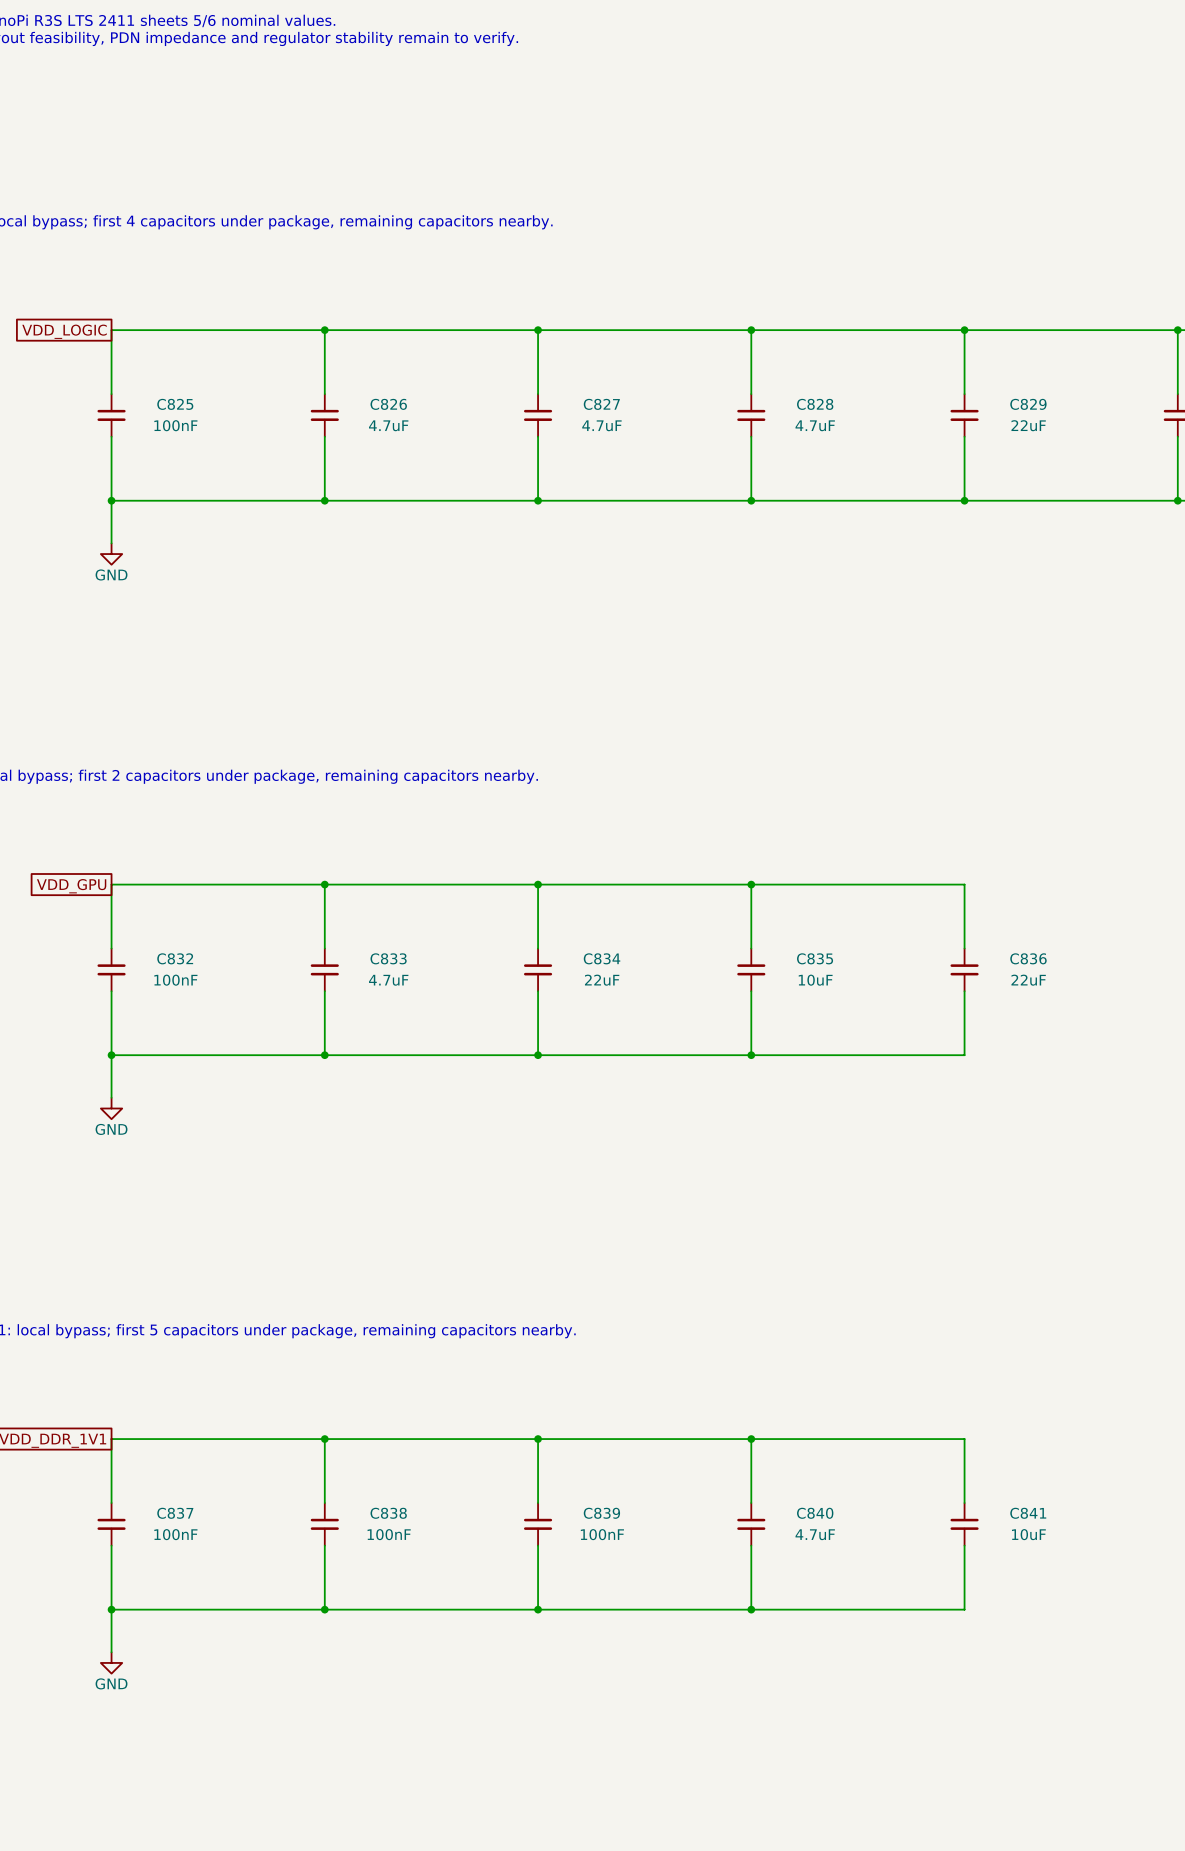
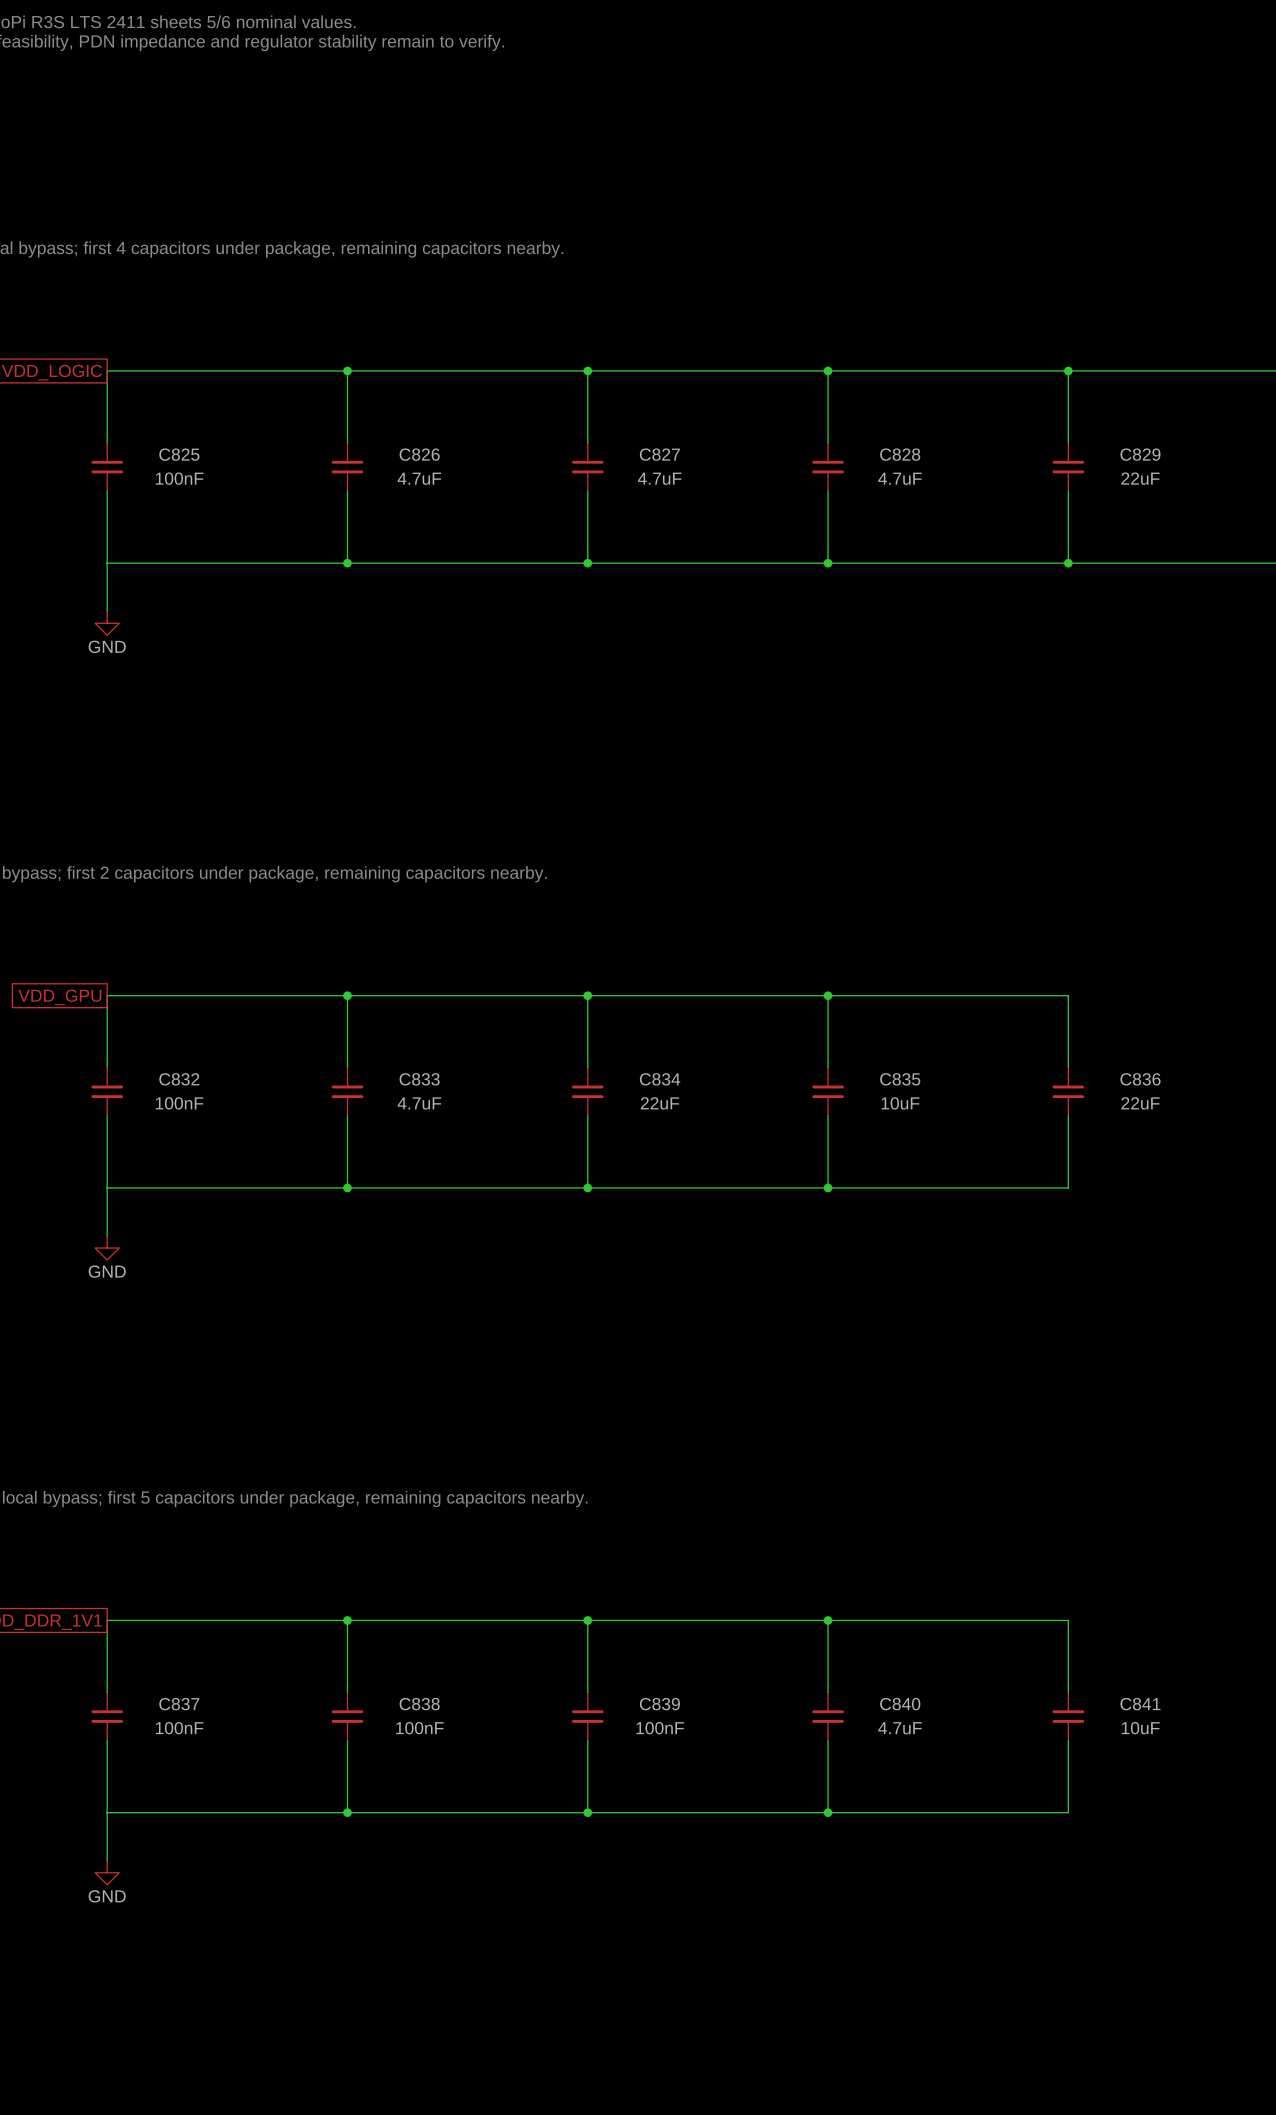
junction: (111, 500) -> none
junction: (111, 1055) -> none
junction: (111, 1609) -> none

